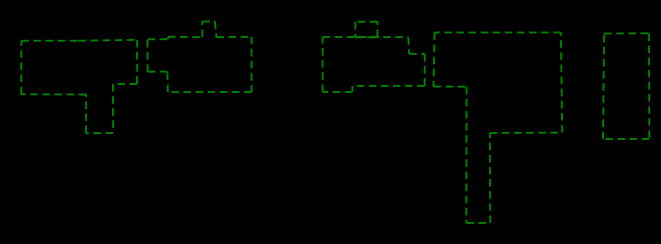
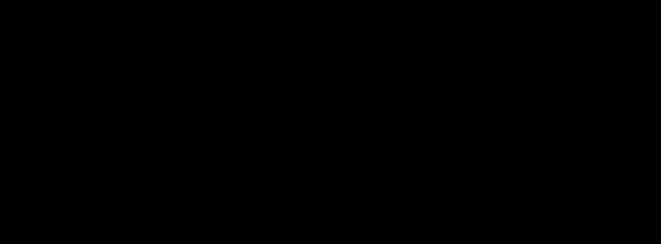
zone outline: (214, 21) (202, 21) (202, 37) (167, 36) (168, 39) (147, 39) (147, 71) (167, 71) (167, 92) (251, 91) (251, 36) (216, 37) (214, 21) -> none
zone outline: (377, 21) (377, 37) (355, 37) (355, 21) (377, 21) -> none
zone outline: (560, 32) (562, 132) (489, 132) (490, 222) (466, 222) (466, 86) (433, 86) (434, 32) (560, 32) -> none
zone outline: (649, 33) (604, 33) (602, 139) (649, 138) (649, 33) -> none
zone outline: (322, 36) (322, 91) (352, 91) (352, 85) (424, 85) (424, 53) (409, 53) (408, 37) (322, 36) -> none
zone outline: (137, 39) (137, 84) (112, 84) (113, 133) (85, 133) (86, 94) (21, 94) (21, 40) (137, 39) -> none

